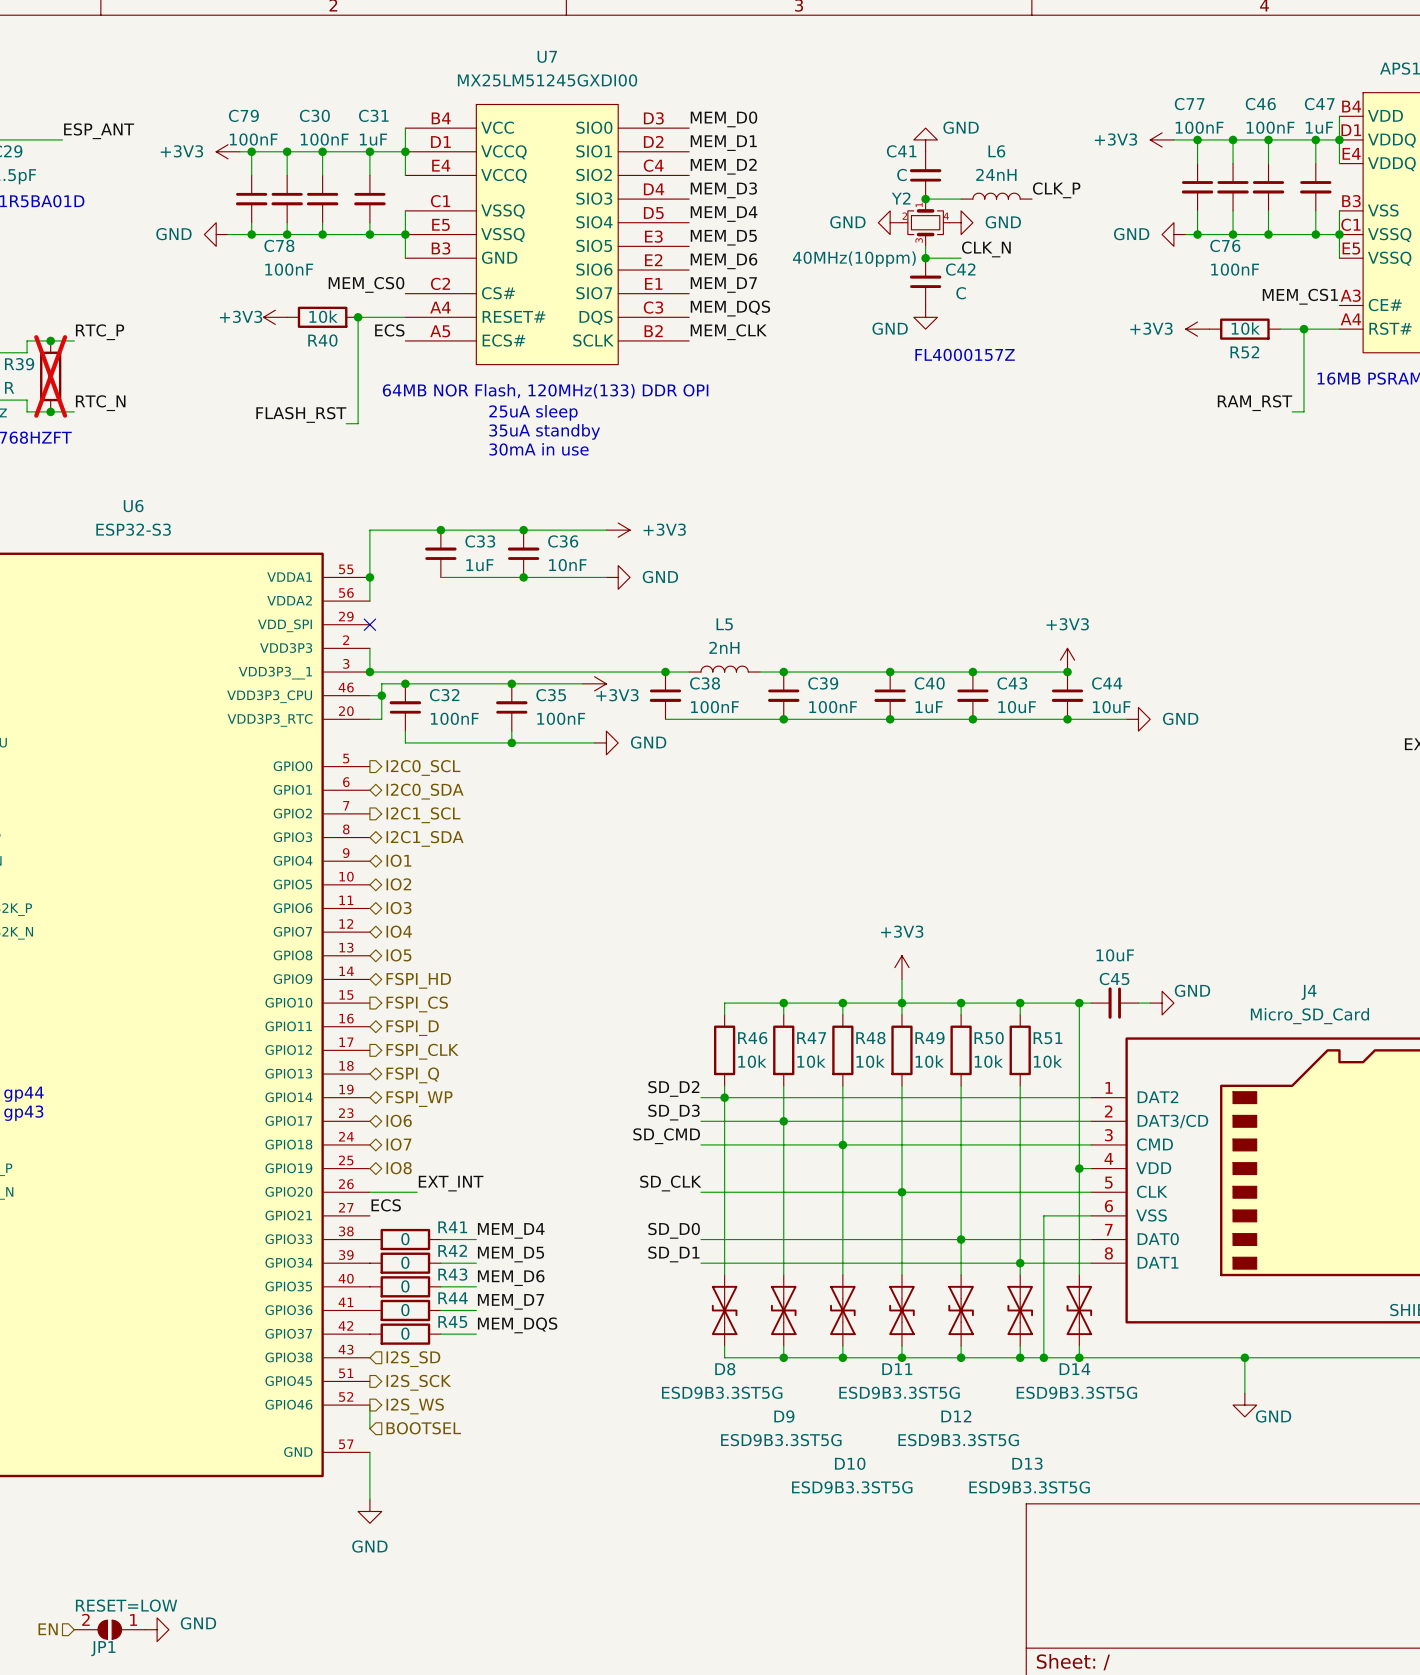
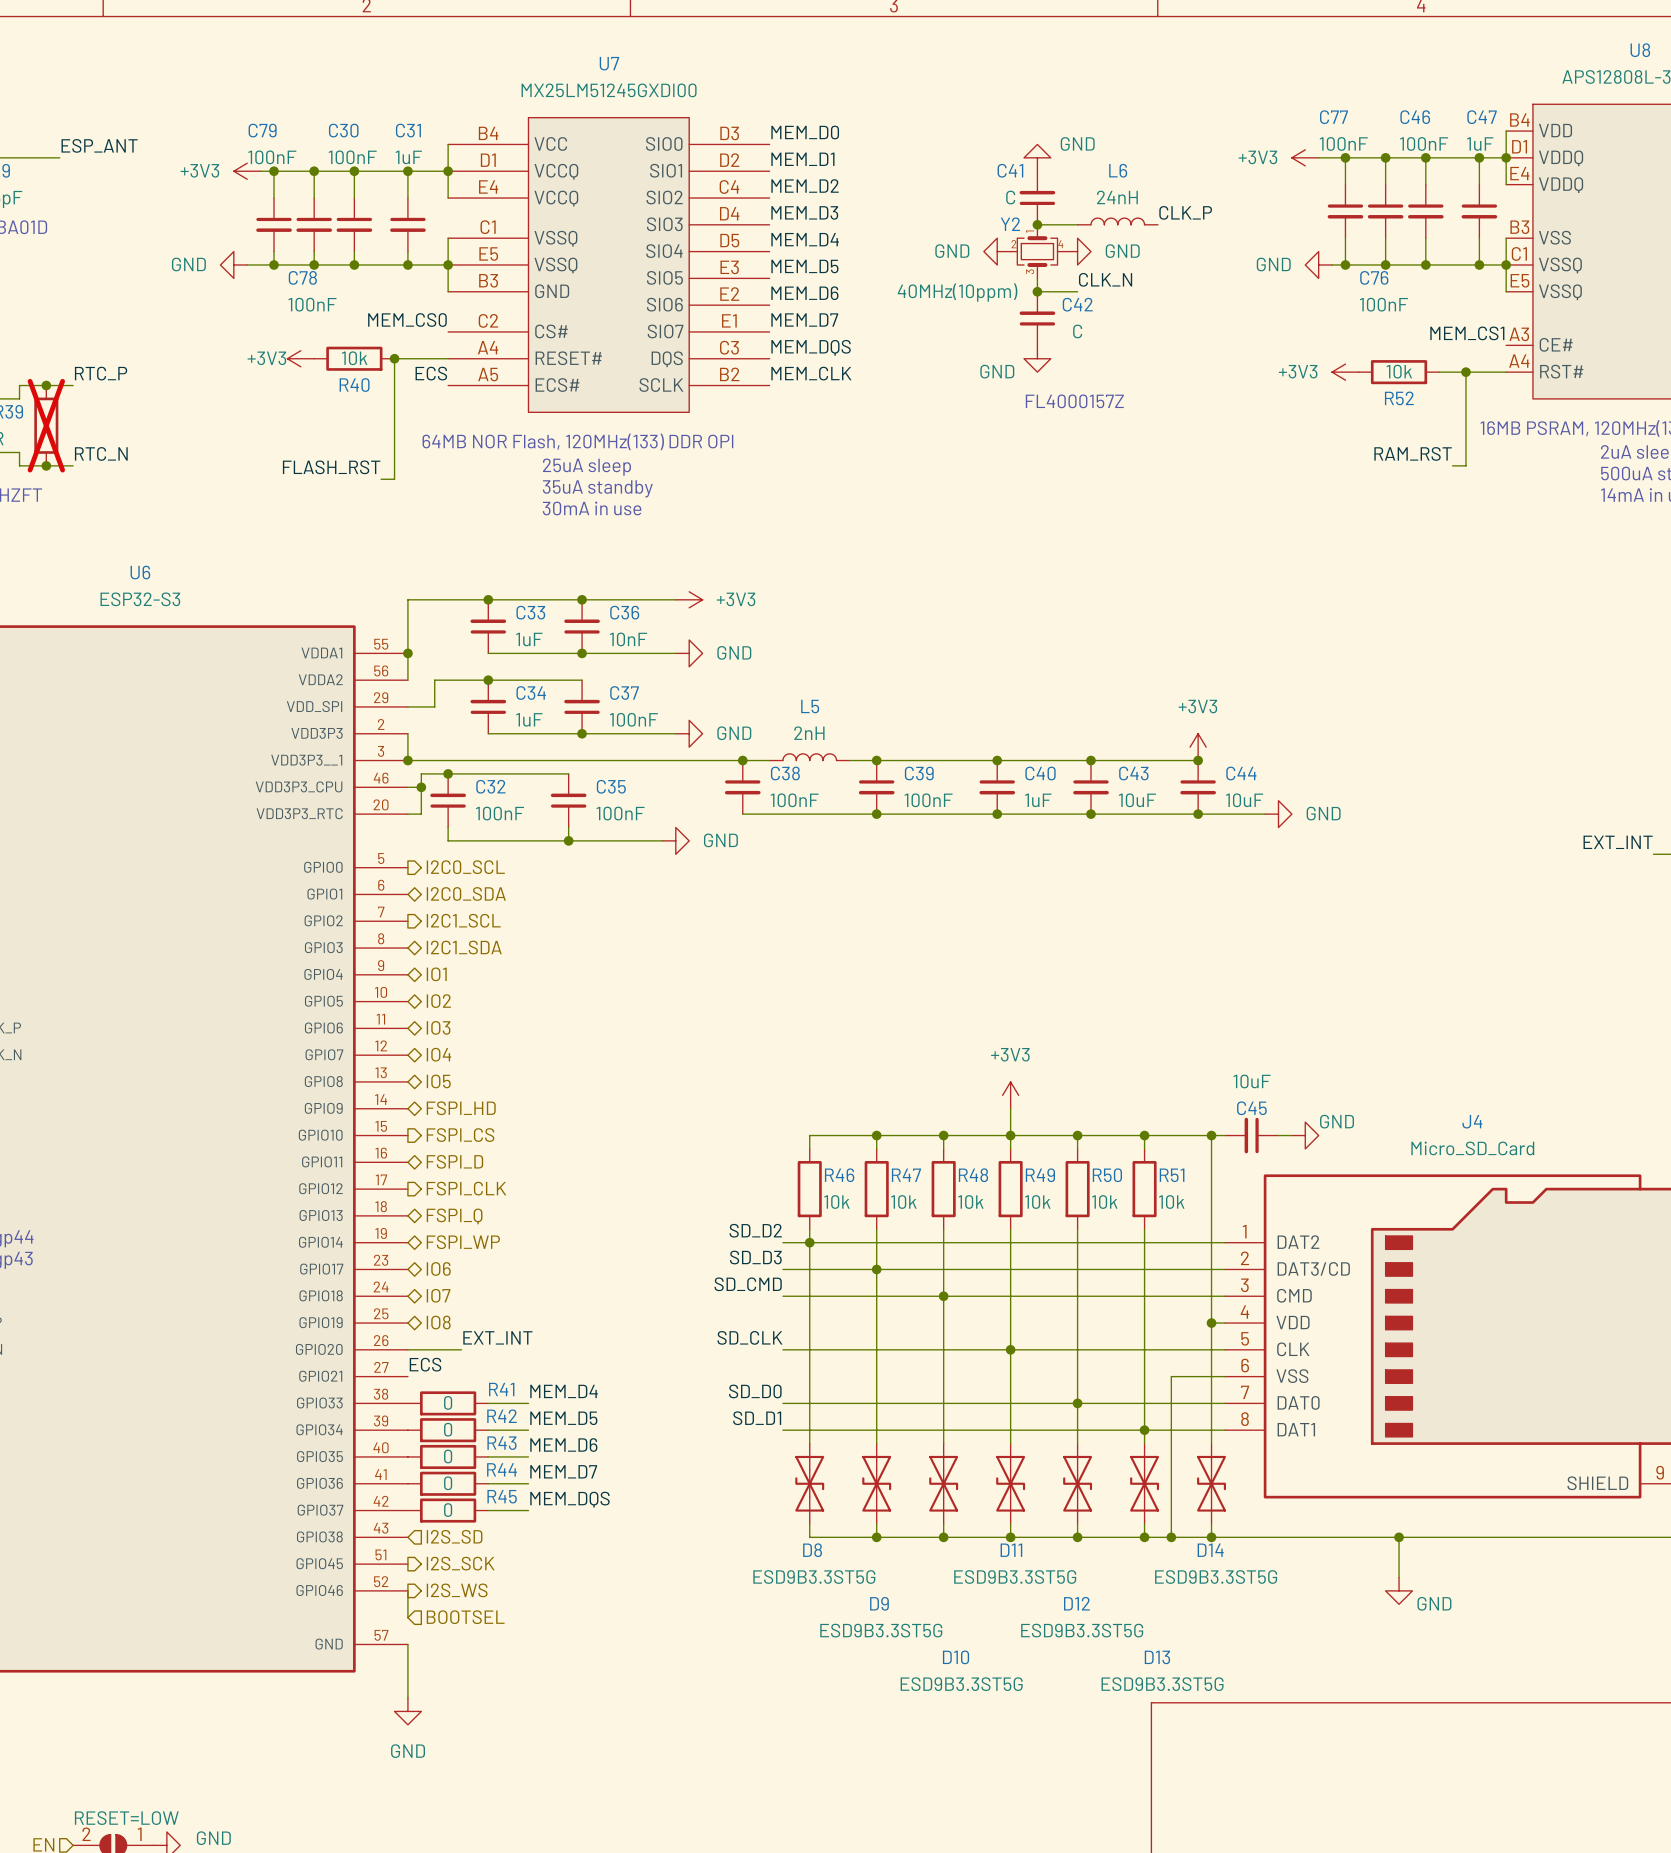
junction: none -> (488, 680)
wire: none -> (582, 680) (434, 680) (434, 706) (407, 706)
no-connect mark: (369, 624) -> none
C34: none -> 1uF (488, 706)
C37: none -> 100nF (582, 706)
wire: none -> (488, 733) (675, 733)
power symbol: none -> GND (689, 733)
wire: (511, 683) (582, 683) -> none
junction position: (511, 683) -> (582, 733)
power symbol: +3V3 (594, 683) -> none

